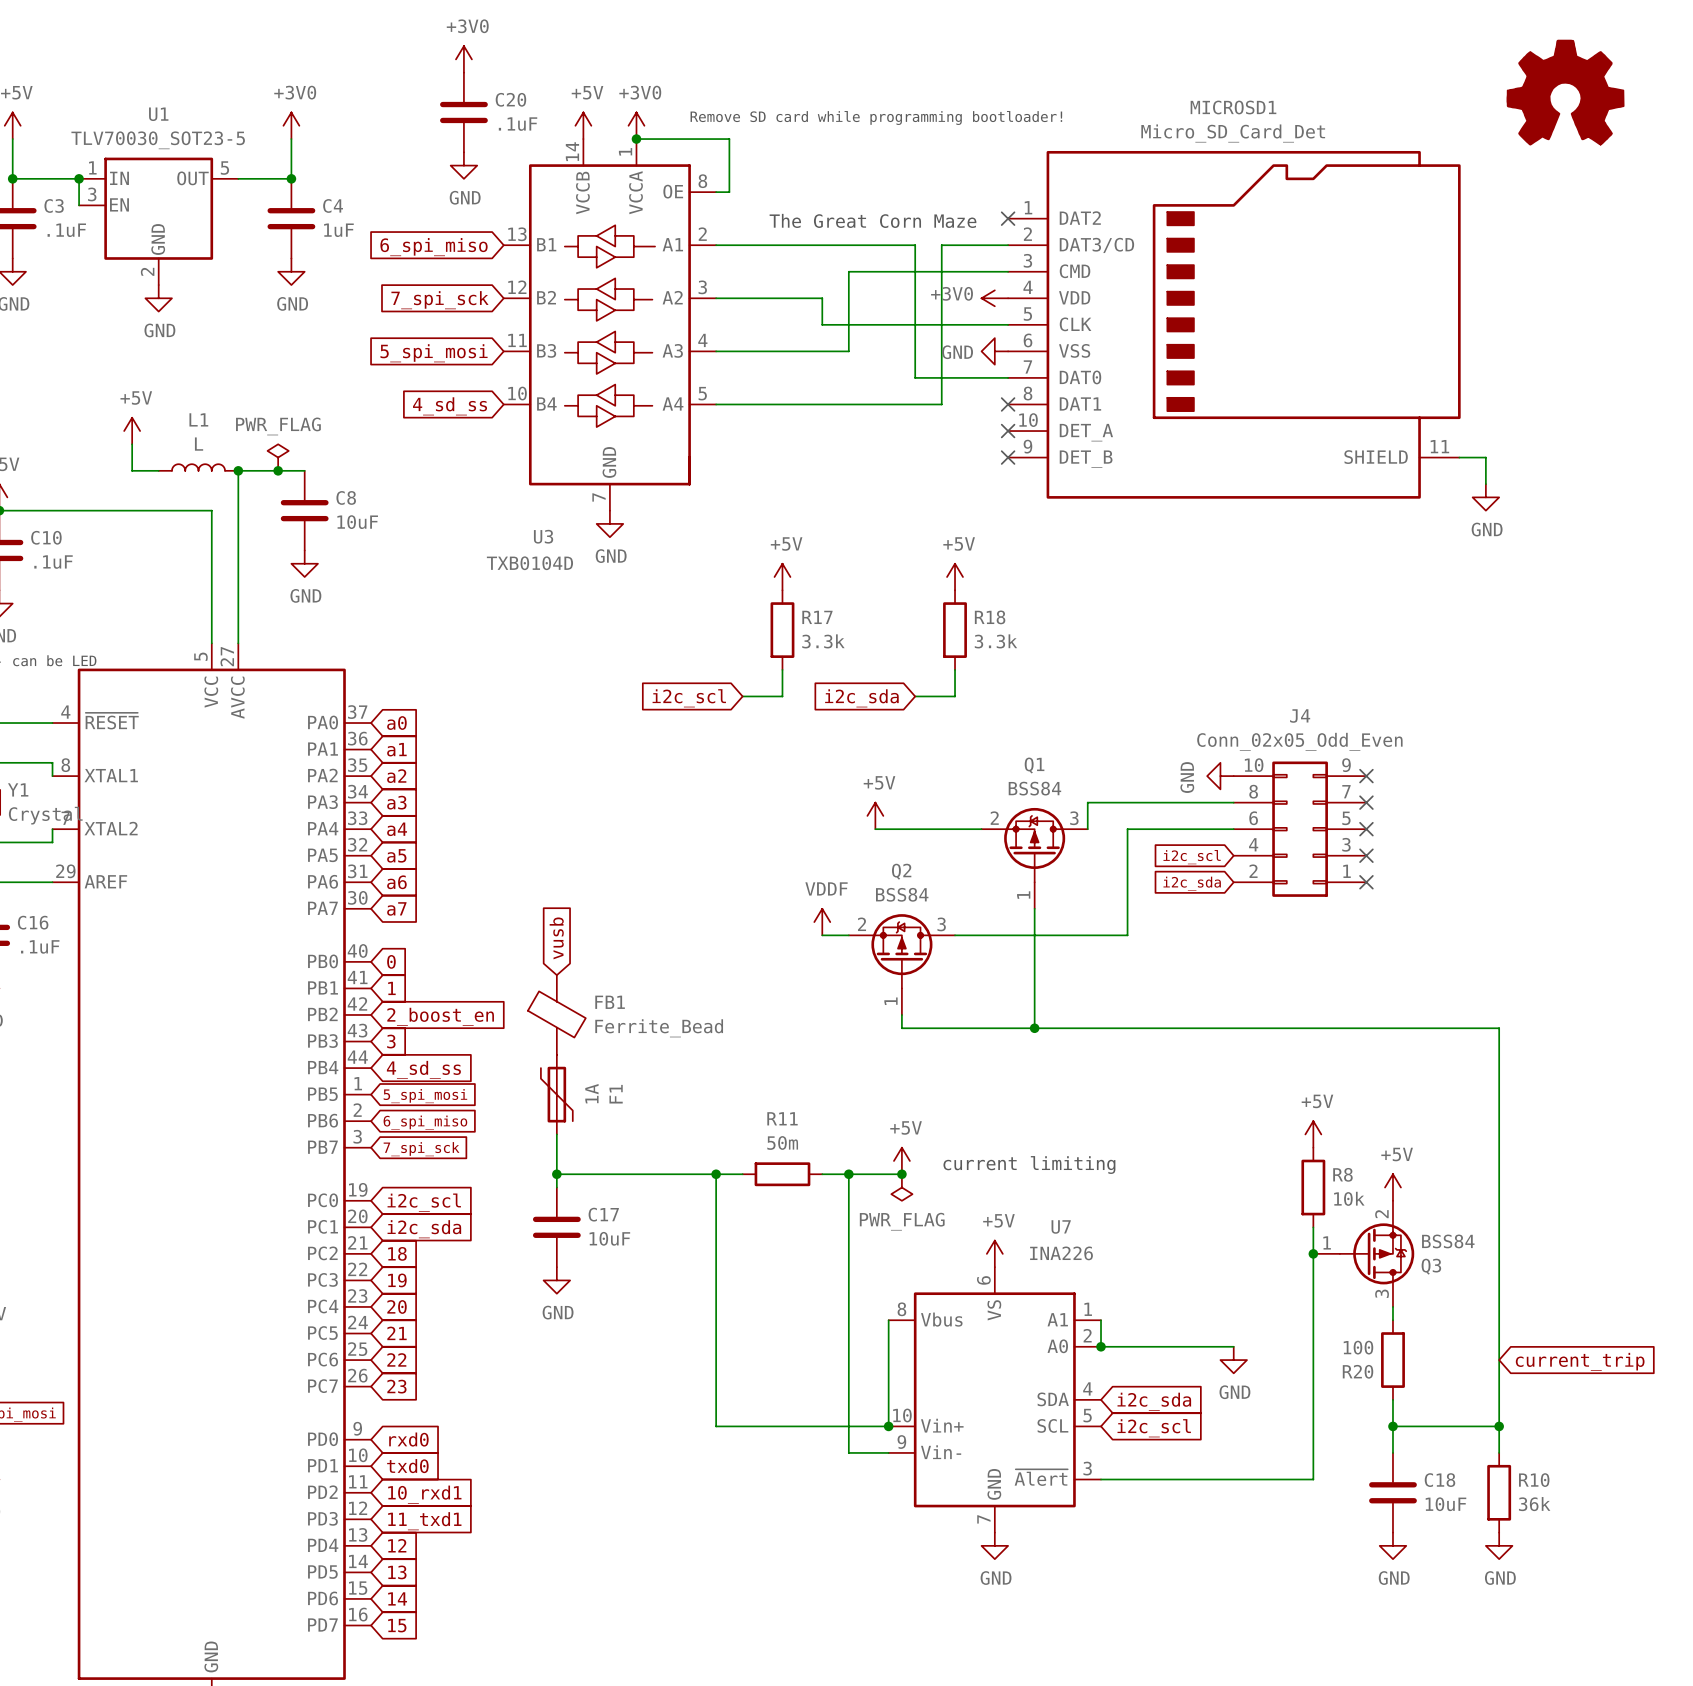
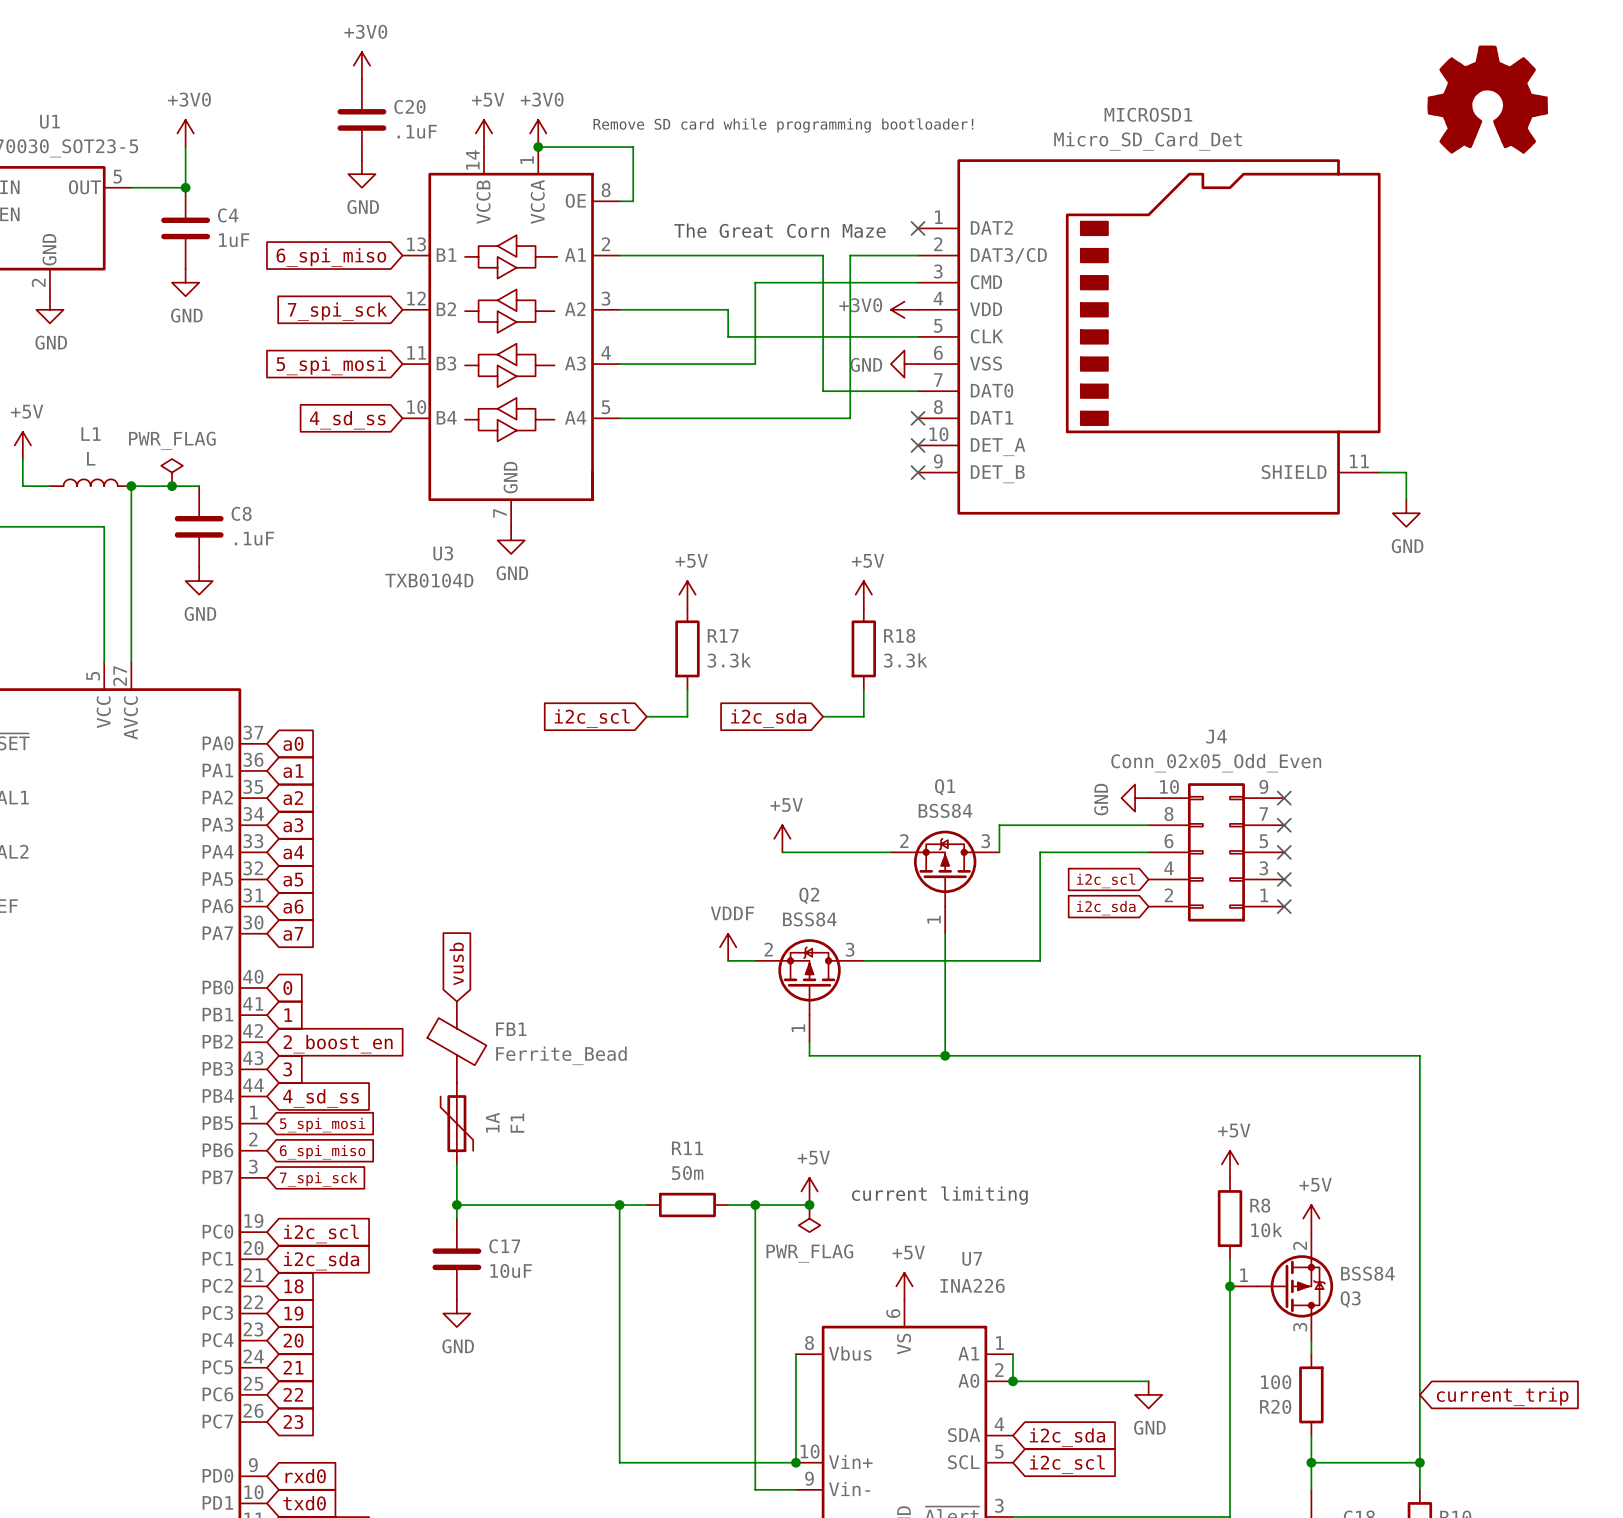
C8 value: 10uF (357, 522) -> .1uF (254, 538)

